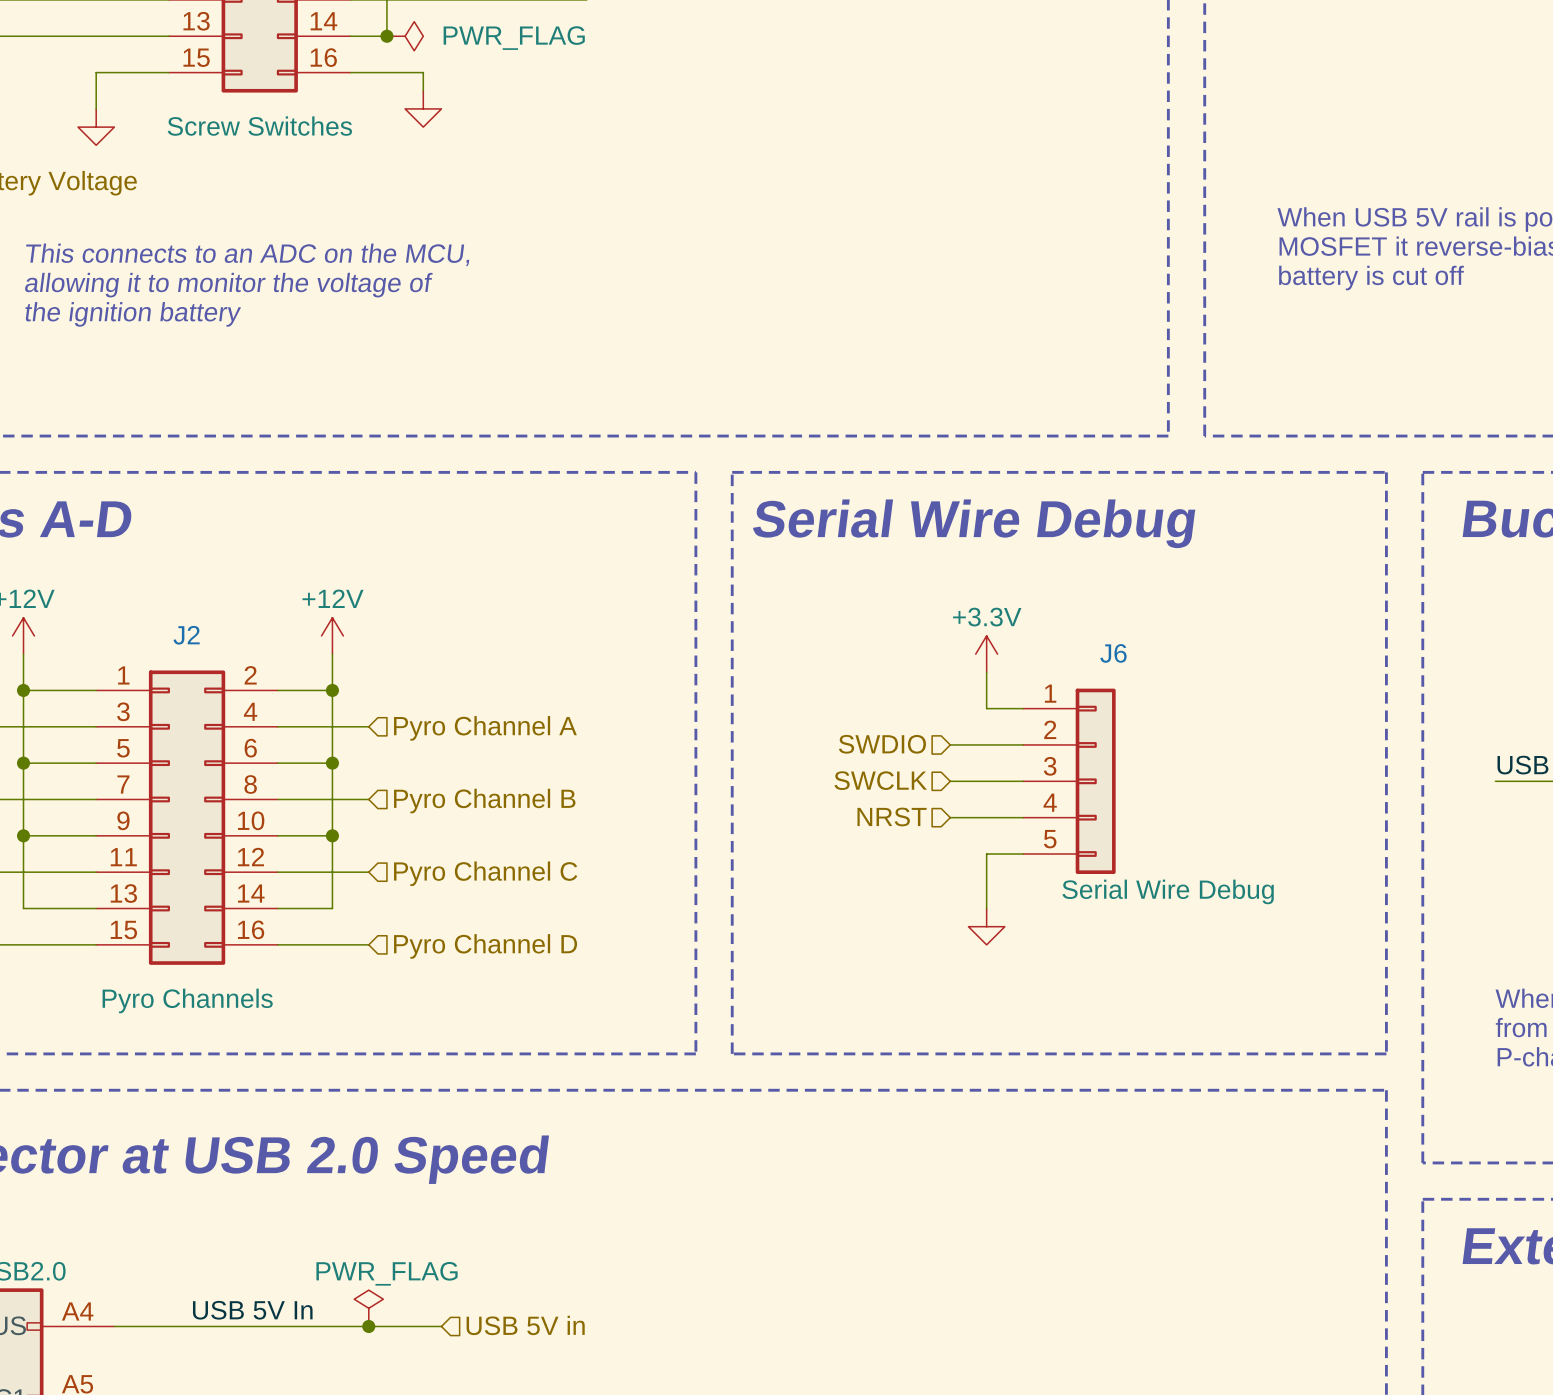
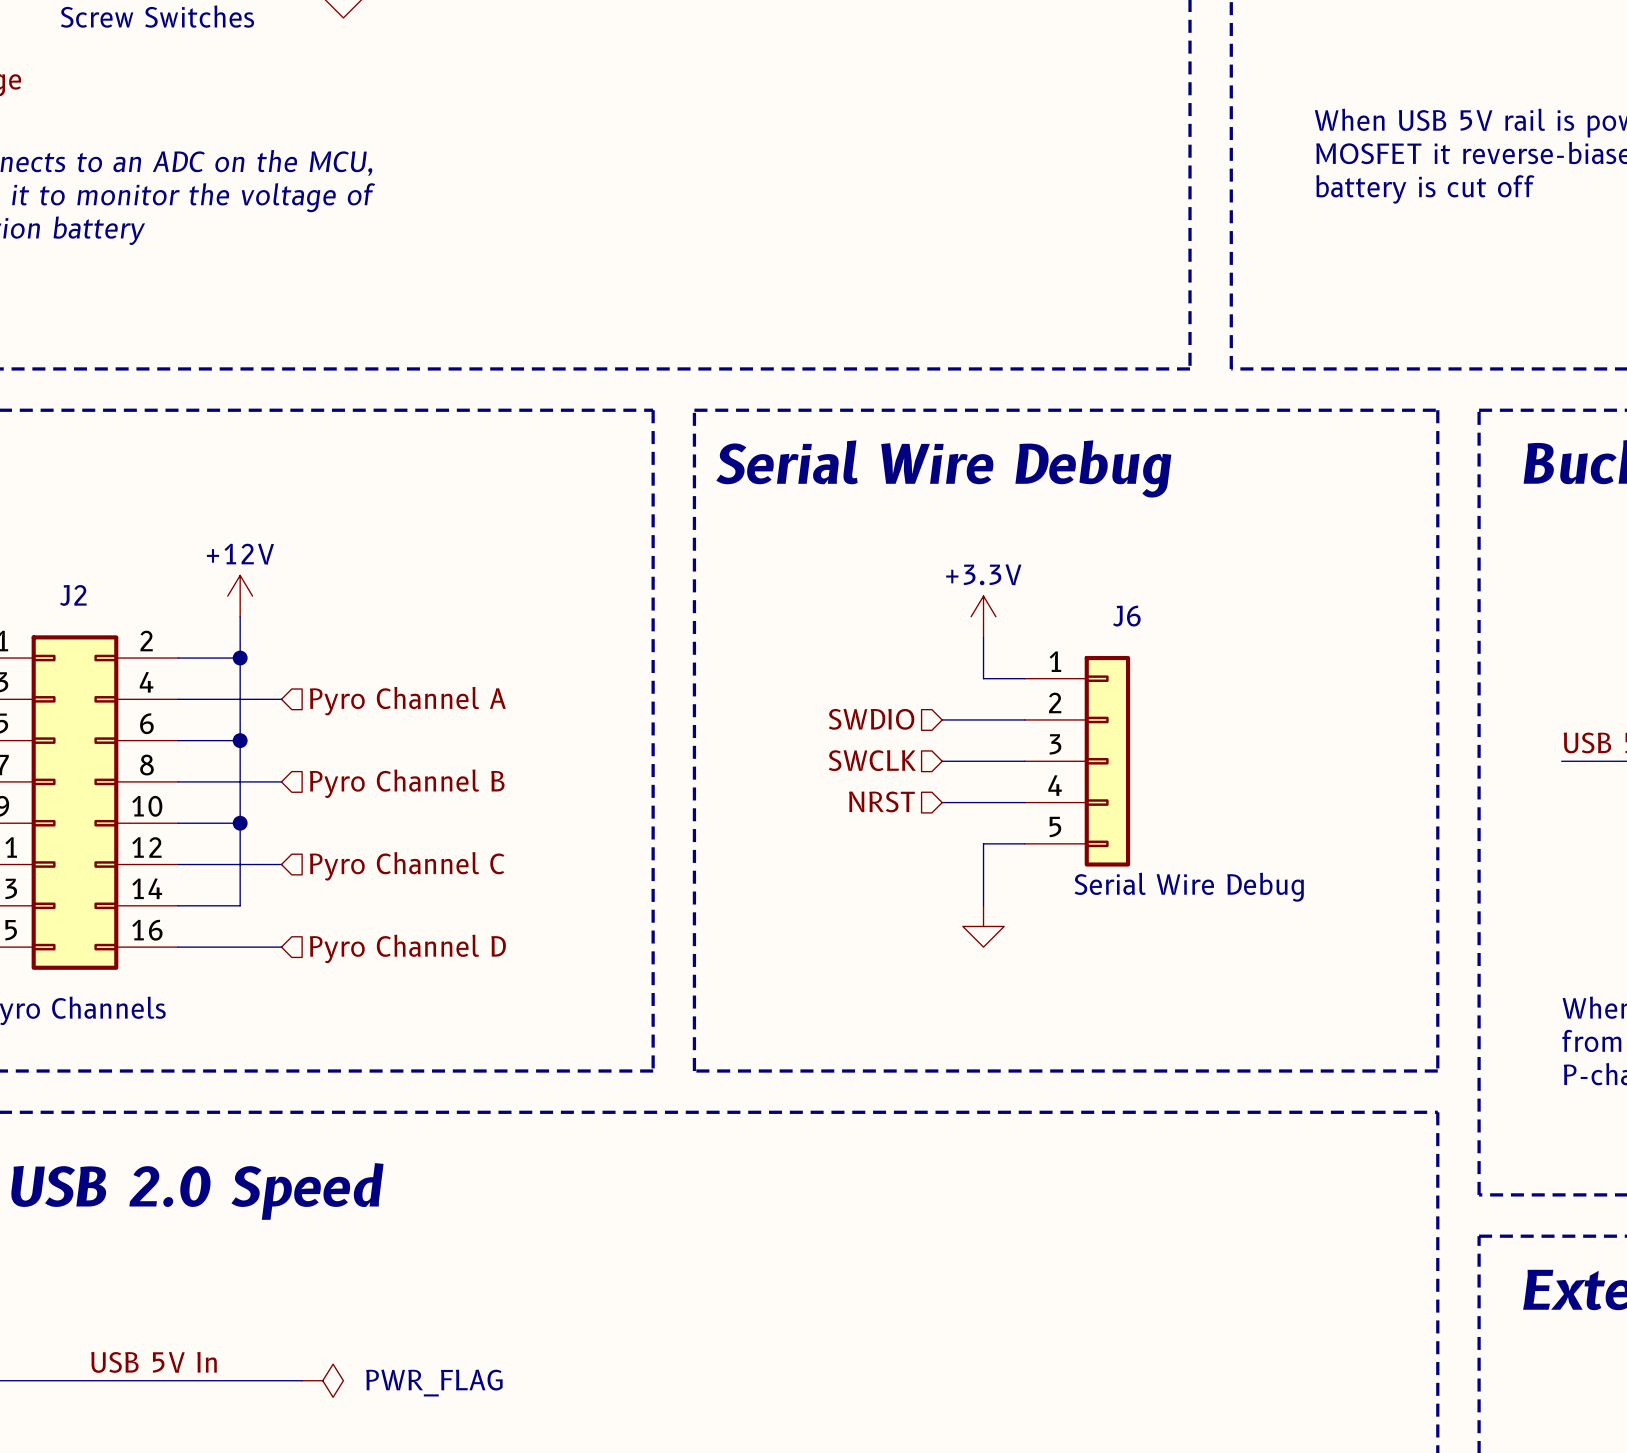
power symbol text position: PWR_FLAG (387, 1273) -> PWR_FLAG (434, 1383)
power symbol rotation: 0° (368, 1308) -> 90° clockwise (322, 1380)
power symbol position: PWR_FLAG (368, 1308) -> PWR_FLAG (322, 1380)
hierarchical label: USB 5V in (525, 1325) -> none
junction: (368, 1326) -> none
wire: (386, 1326) (441, 1326) -> none

